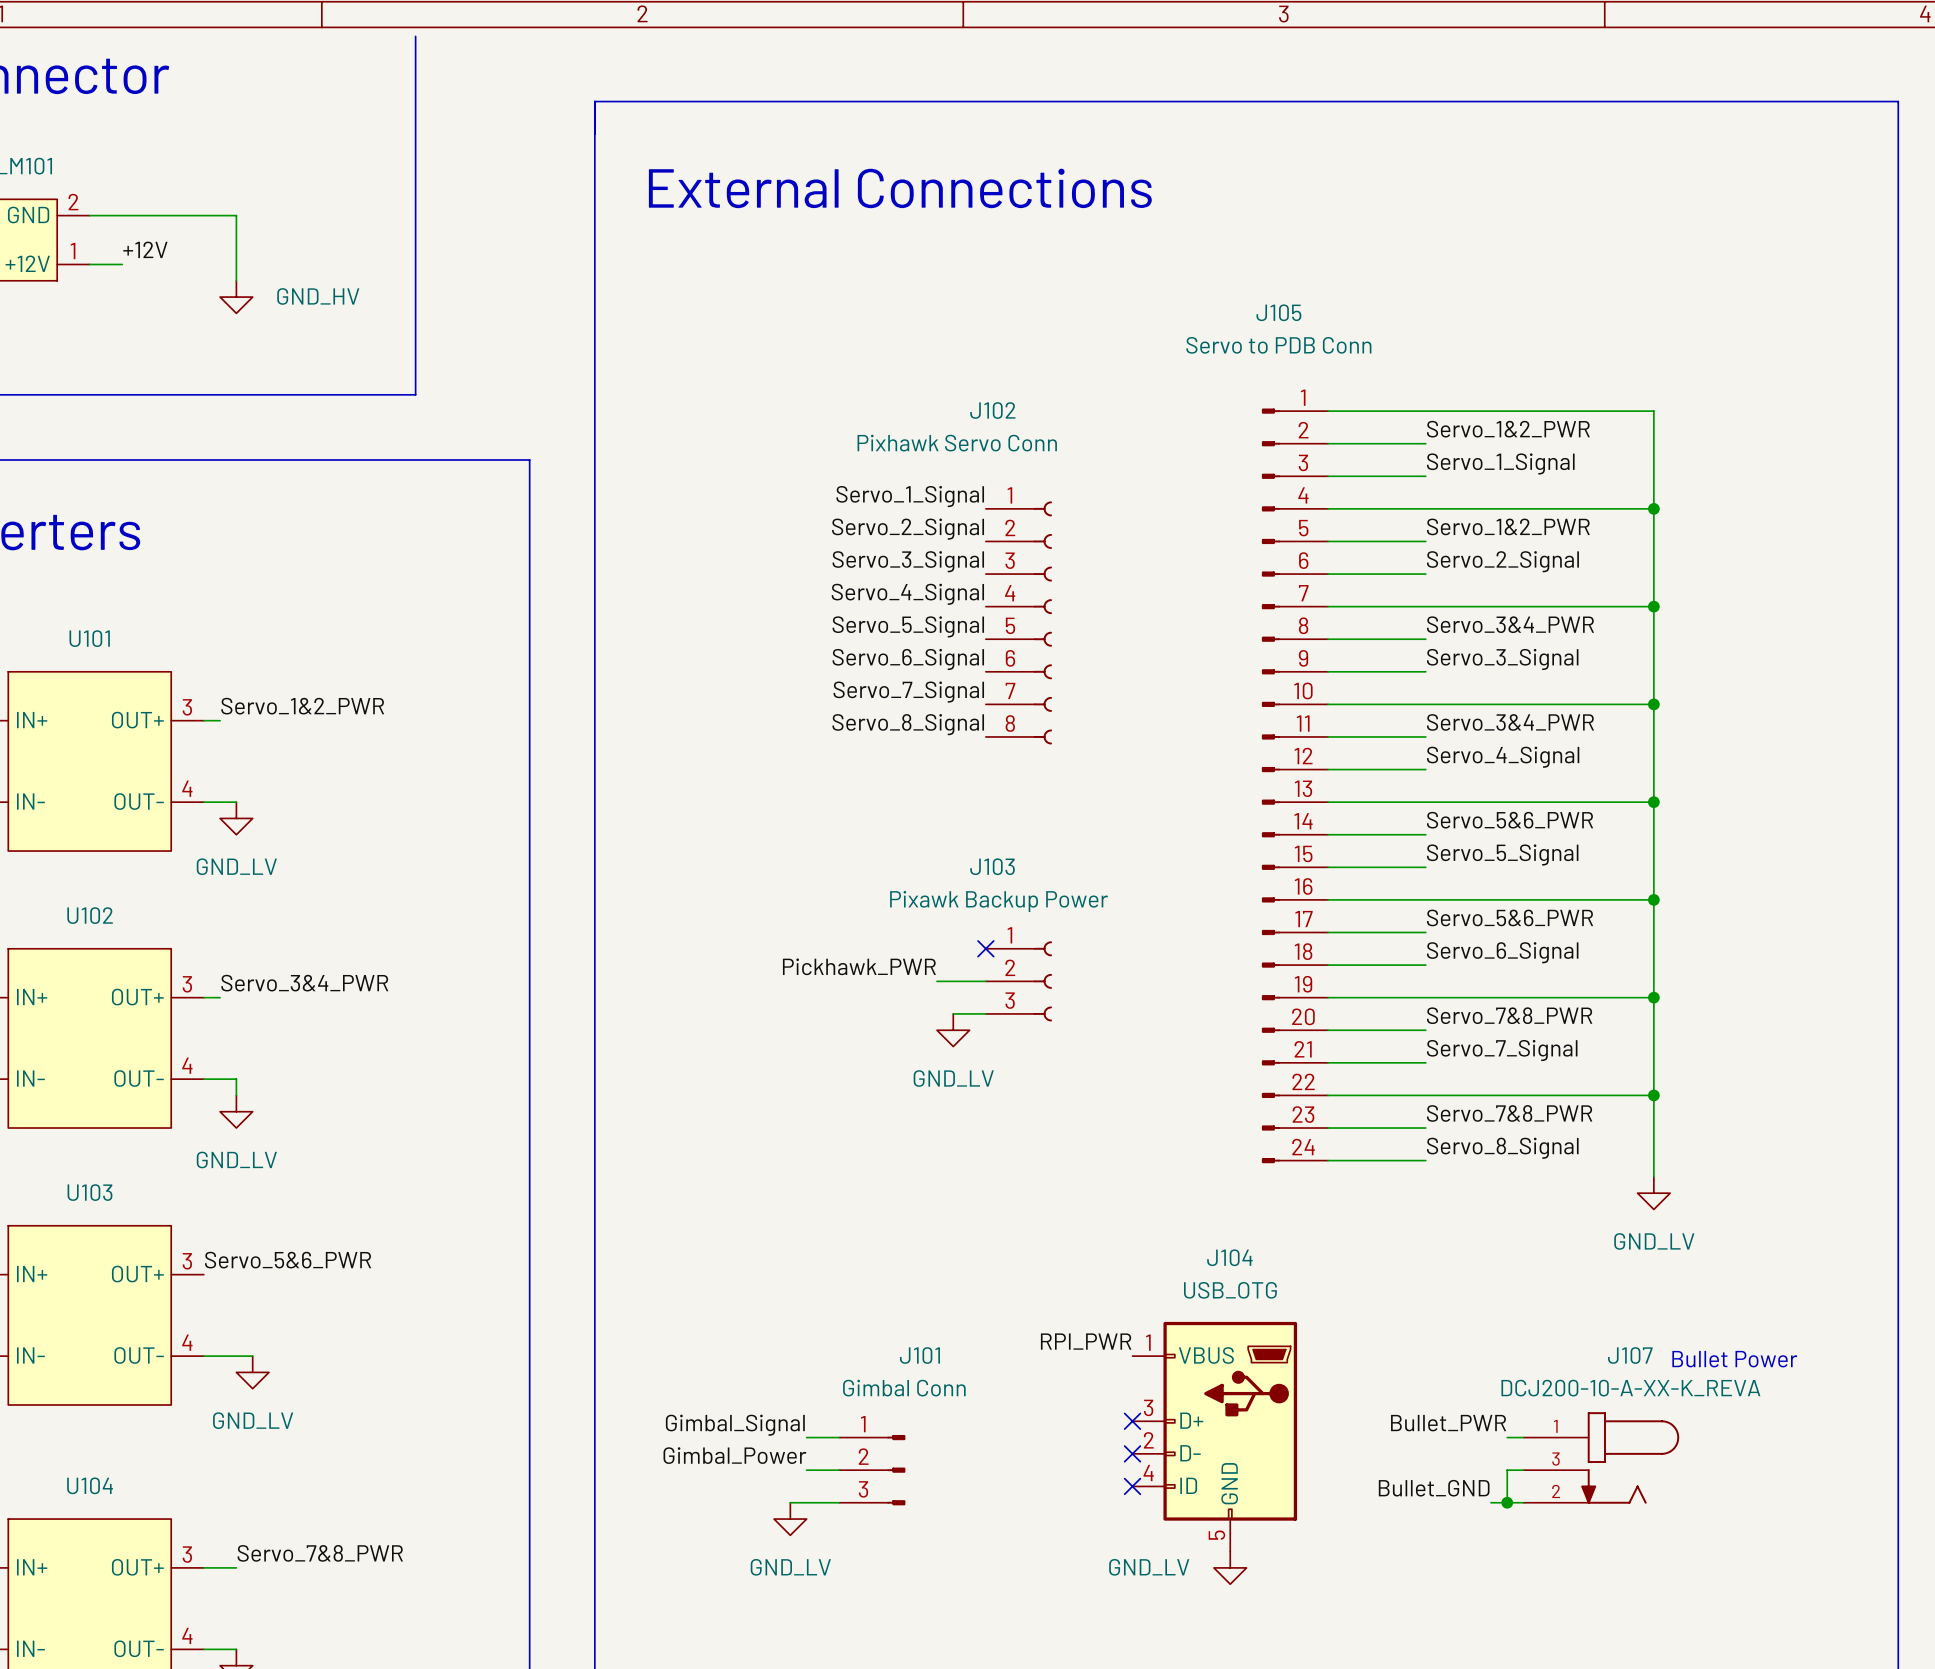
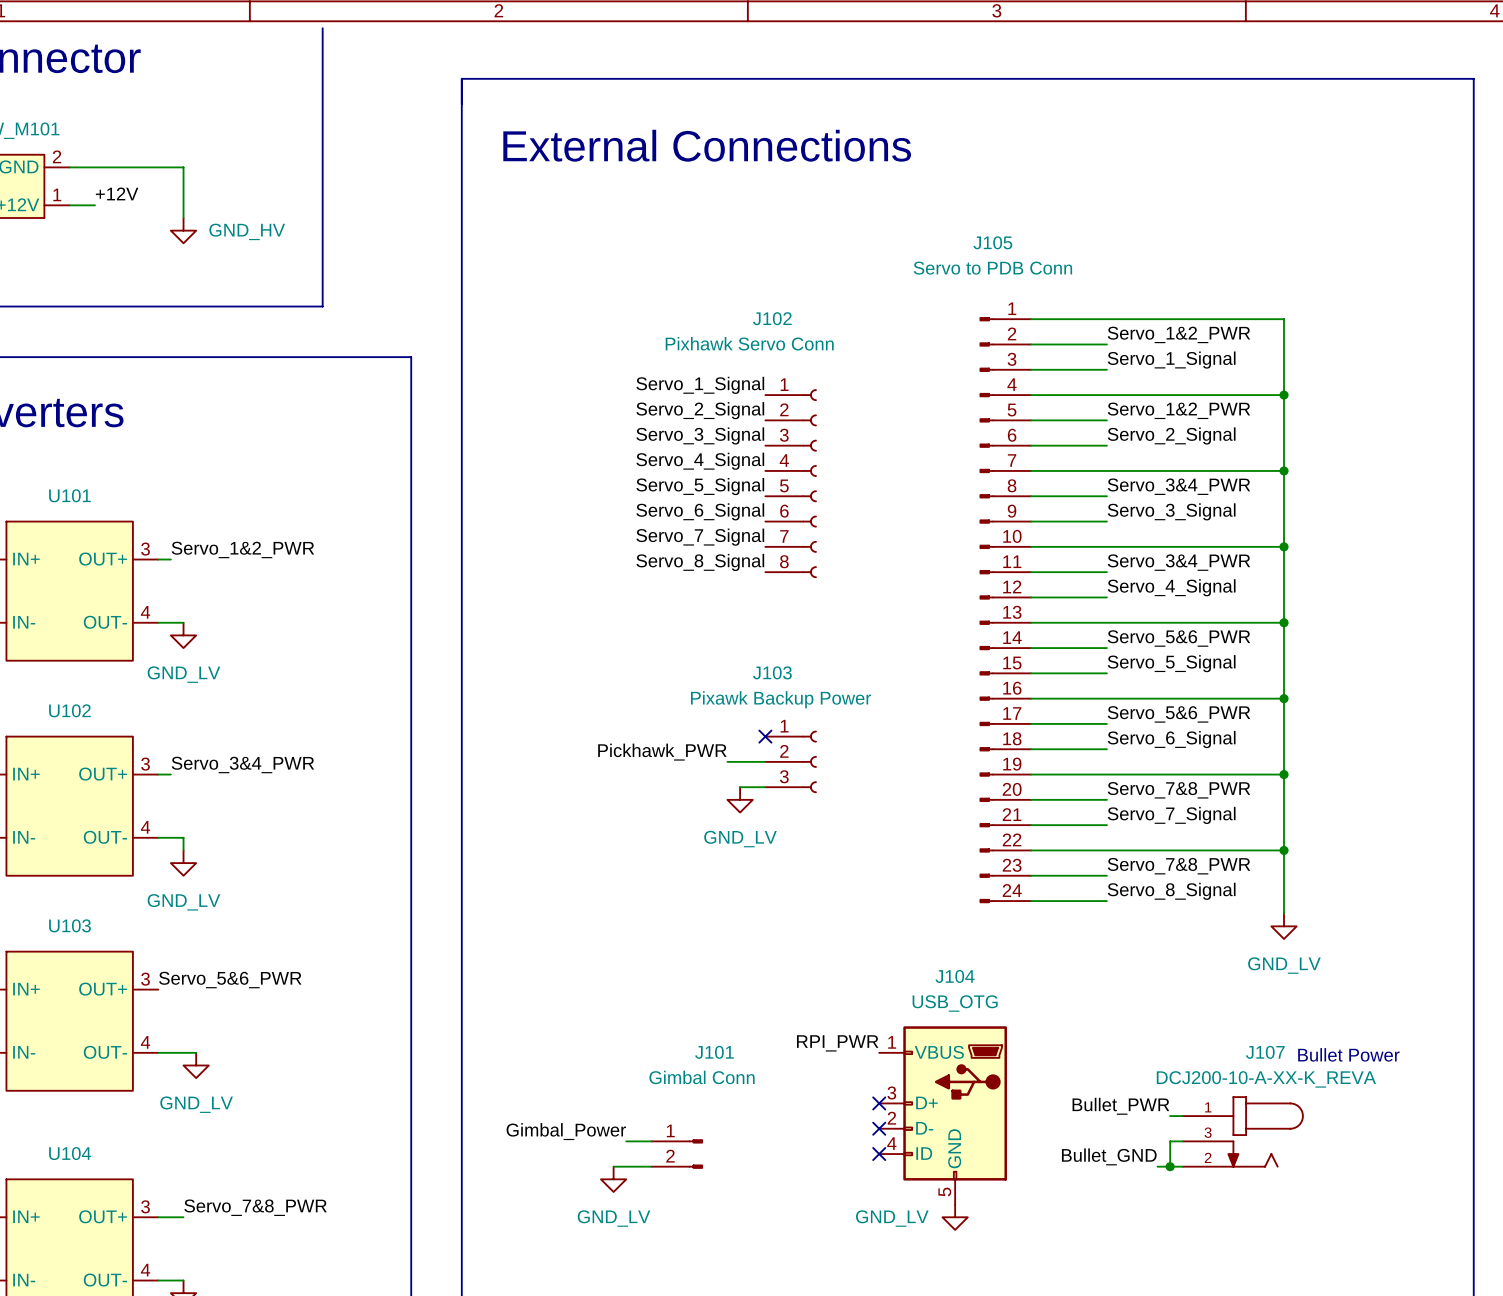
label: Gimbal_Signal (735, 1425) -> none
J101 symbol: [839, 1434, 906, 1506] -> [651, 1139, 703, 1169]
wire: (806, 1437) (839, 1437) -> none

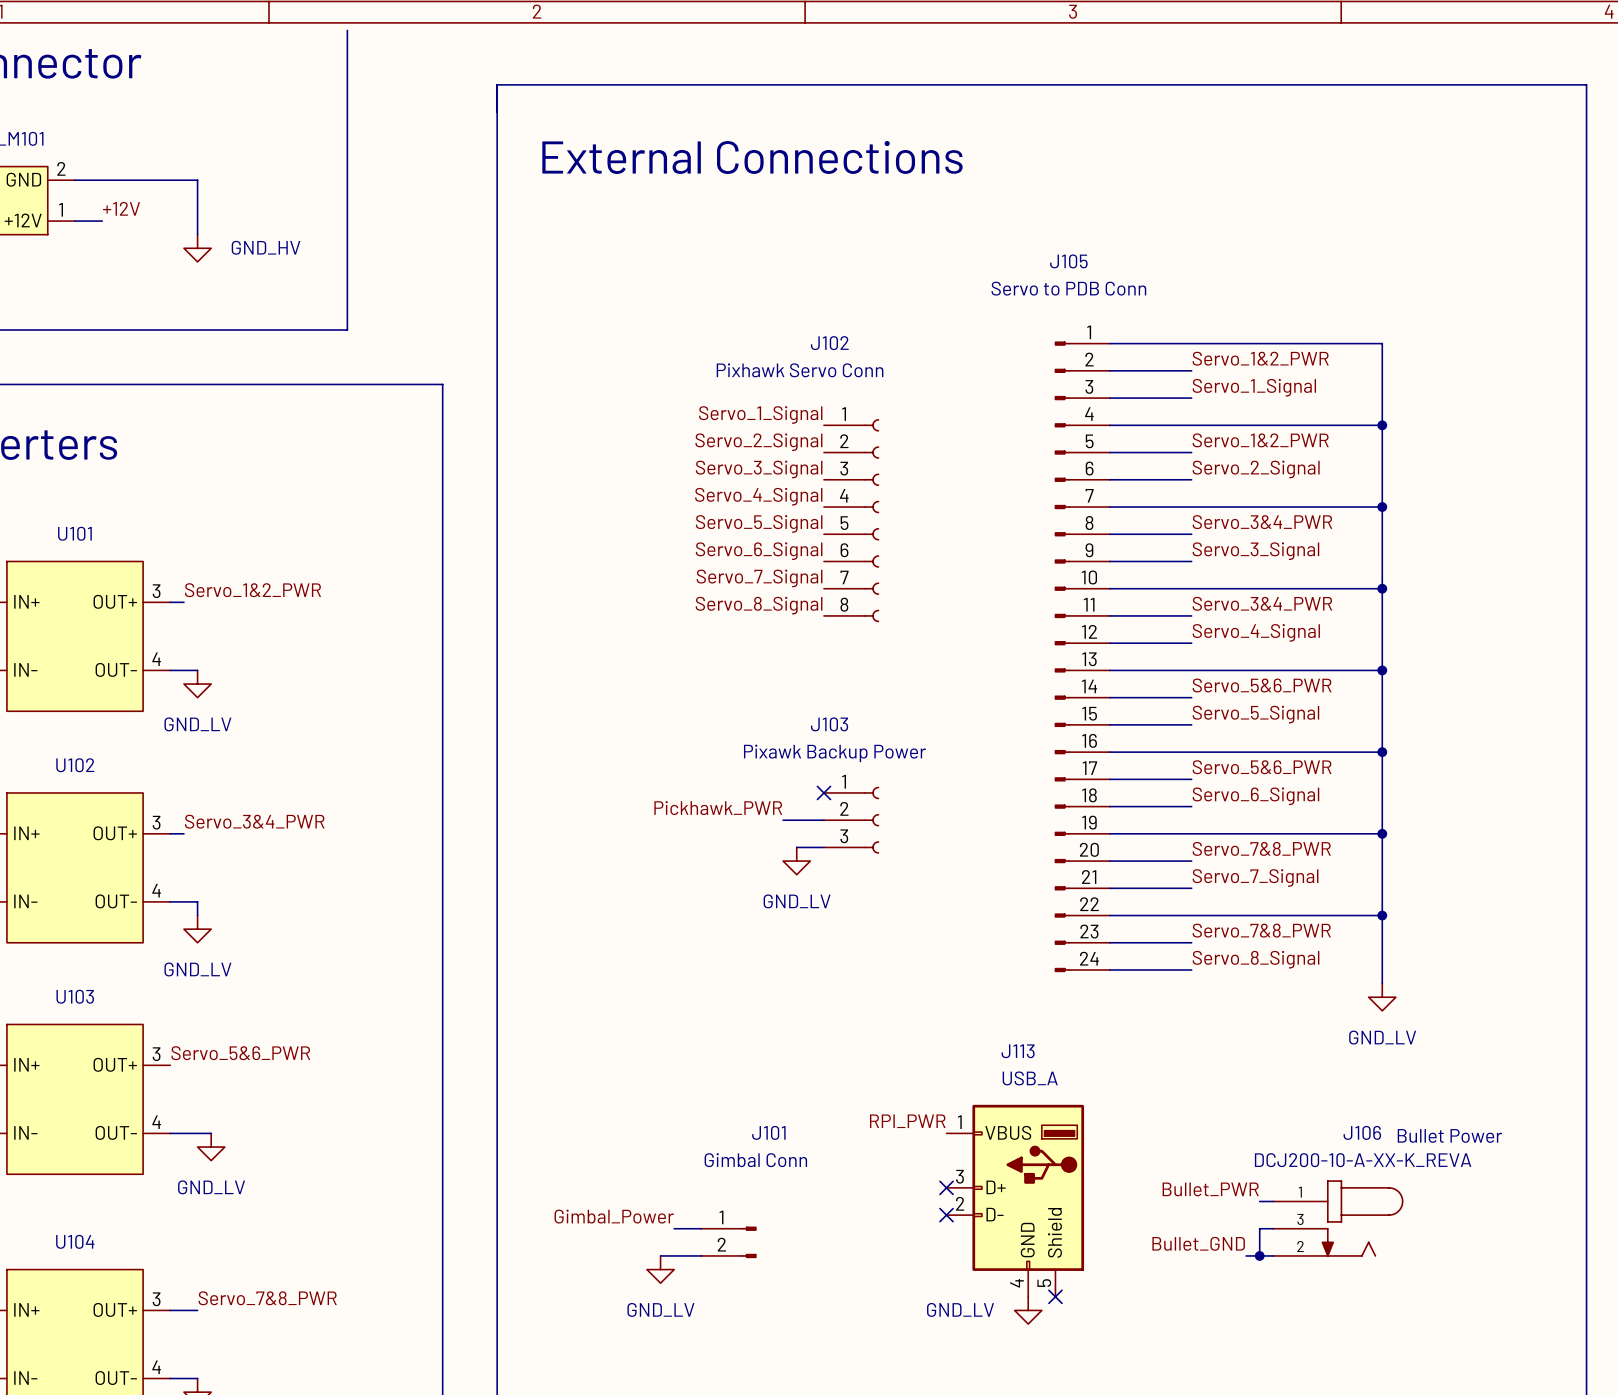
J107 name: J107 (1265, 1052) -> J106 (1362, 1132)
J104: USB_OTG (943, 1115) -> none
J113: none -> USB_A (1015, 1200)
no-connect mark: (879, 1154) -> none
no-connect mark: none -> (1055, 1296)

